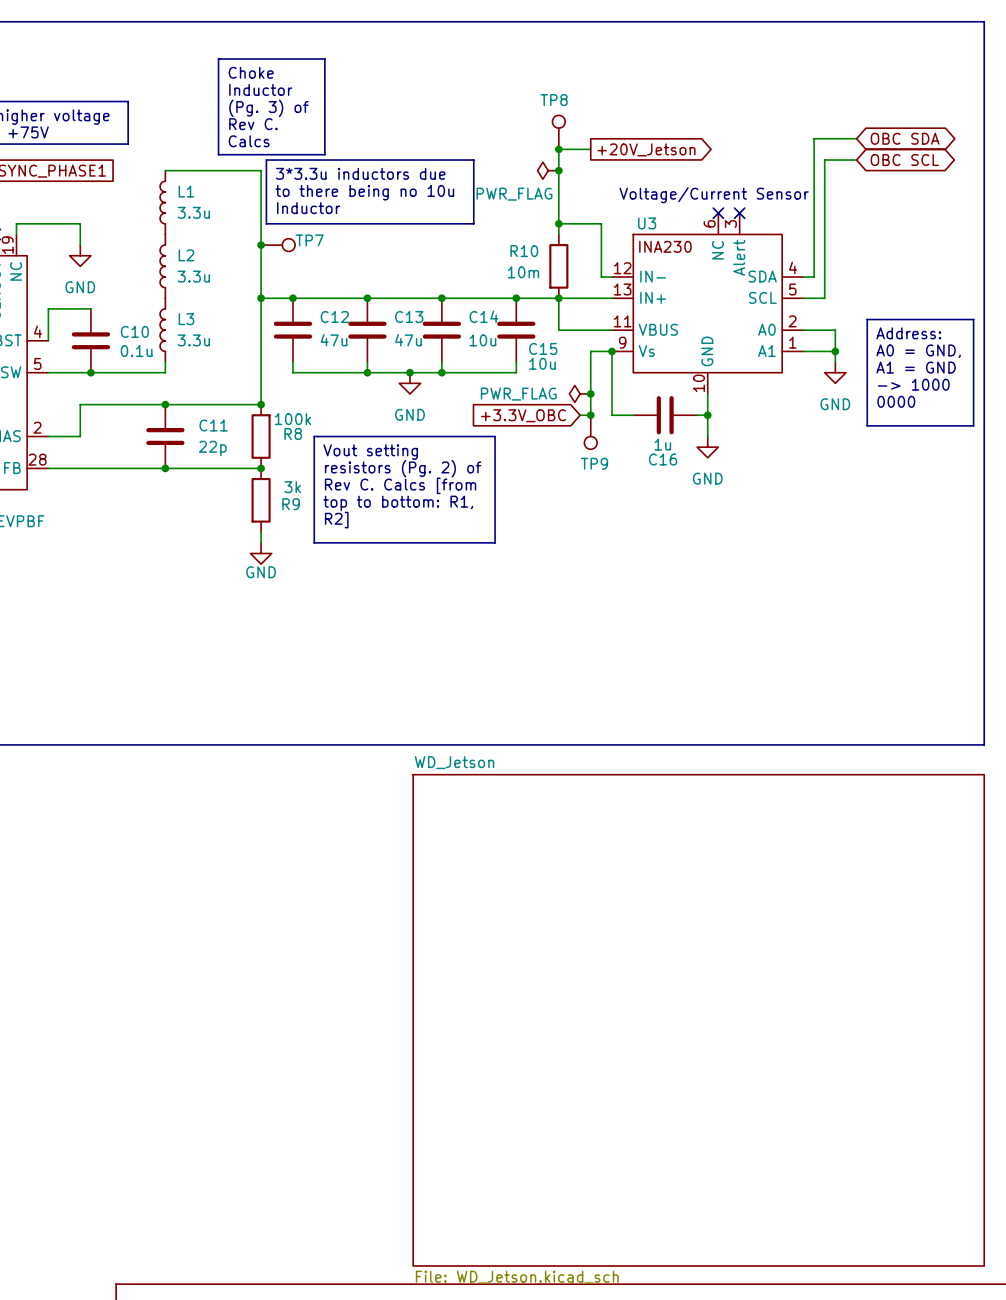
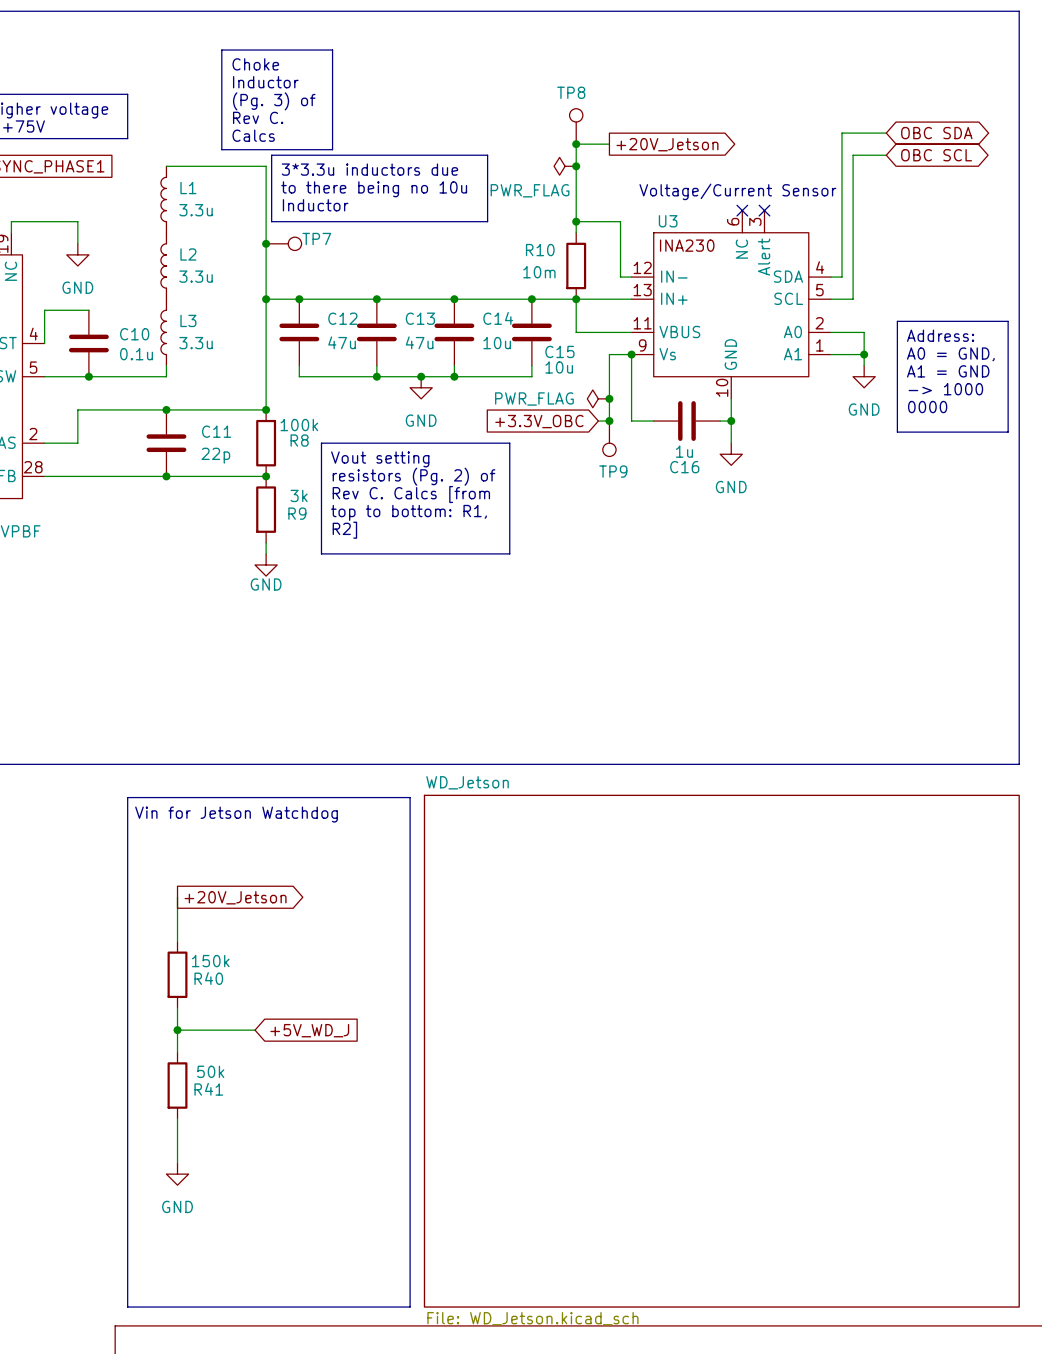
line: none -> (127, 797) (410, 797) (410, 1307) (127, 1307) (127, 797)
text: none -> Vin for Jetson Watchdog (236, 814)
wire: none -> (177, 897) (177, 941)
global label: none -> +20V_Jetson (235, 897)
R40: none -> 150k (177, 974)
wire: none -> (177, 1007) (177, 1052)
wire: none -> (177, 1030) (255, 1030)
junction: none -> (177, 1030)
global label: none -> +5V_WD_J (309, 1030)
R41: none -> 50k (177, 1085)
wire: none -> (177, 1118) (177, 1163)
power symbol: none -> GND (177, 1174)

